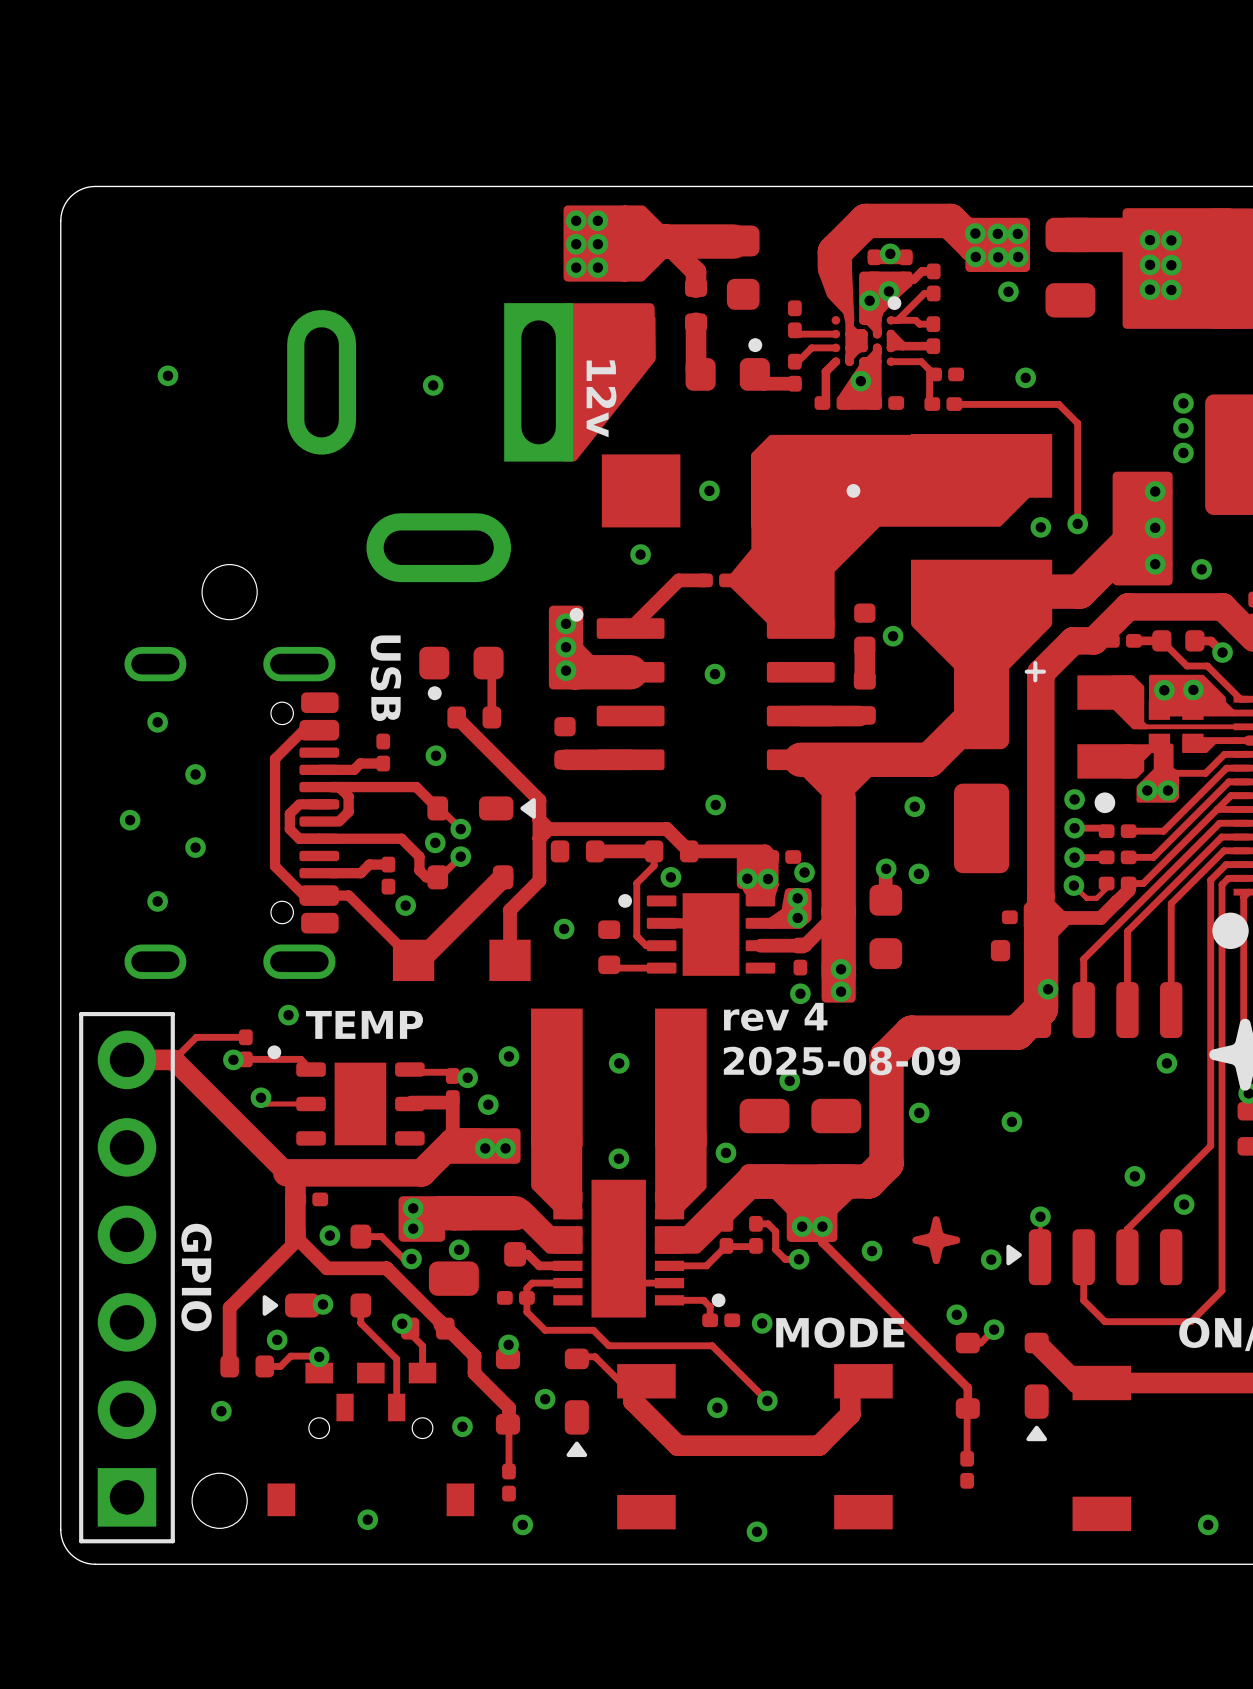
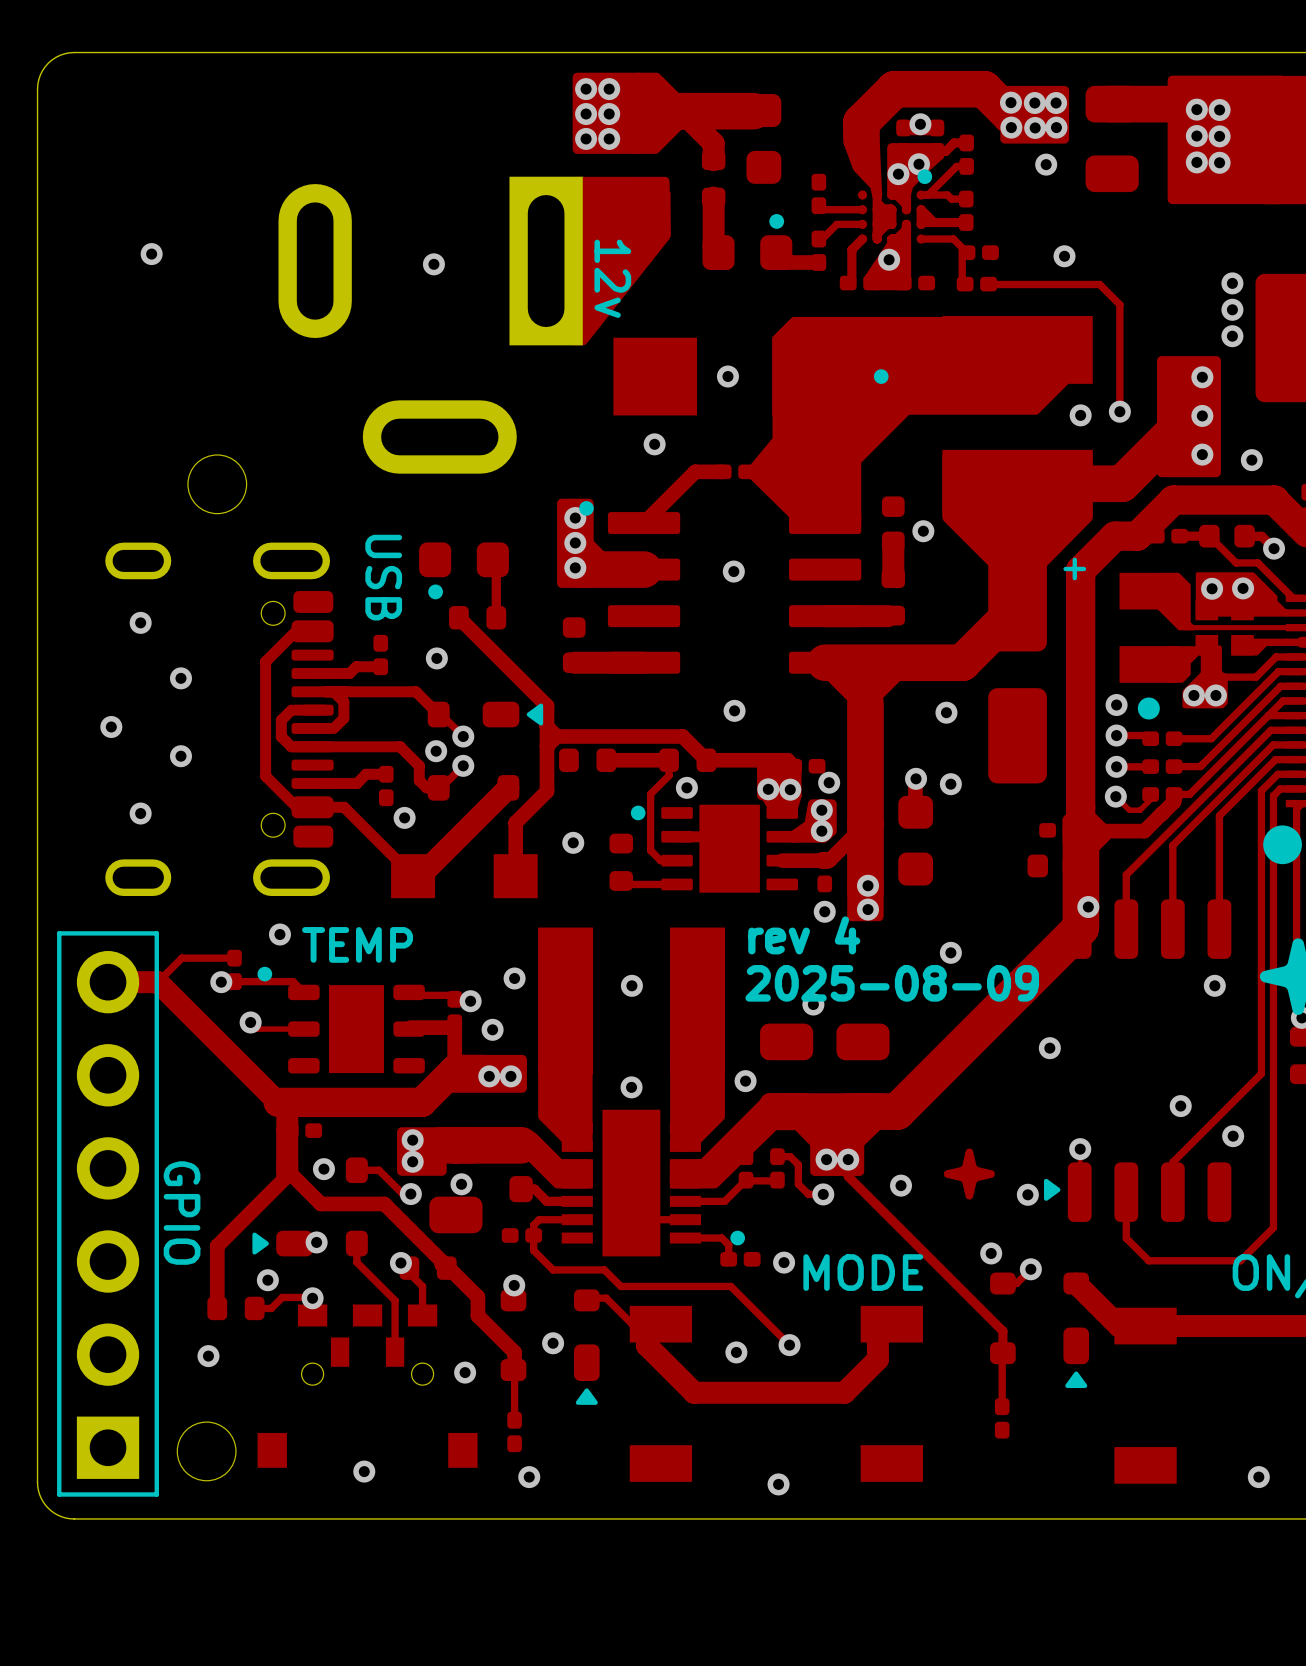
track: (1017, 1032) (911, 1032) (886, 1057) -> (1055, 953) (916, 1092)
track: (886, 1057) (886, 1163) -> none
via position: (919, 1112) -> (950, 952)

